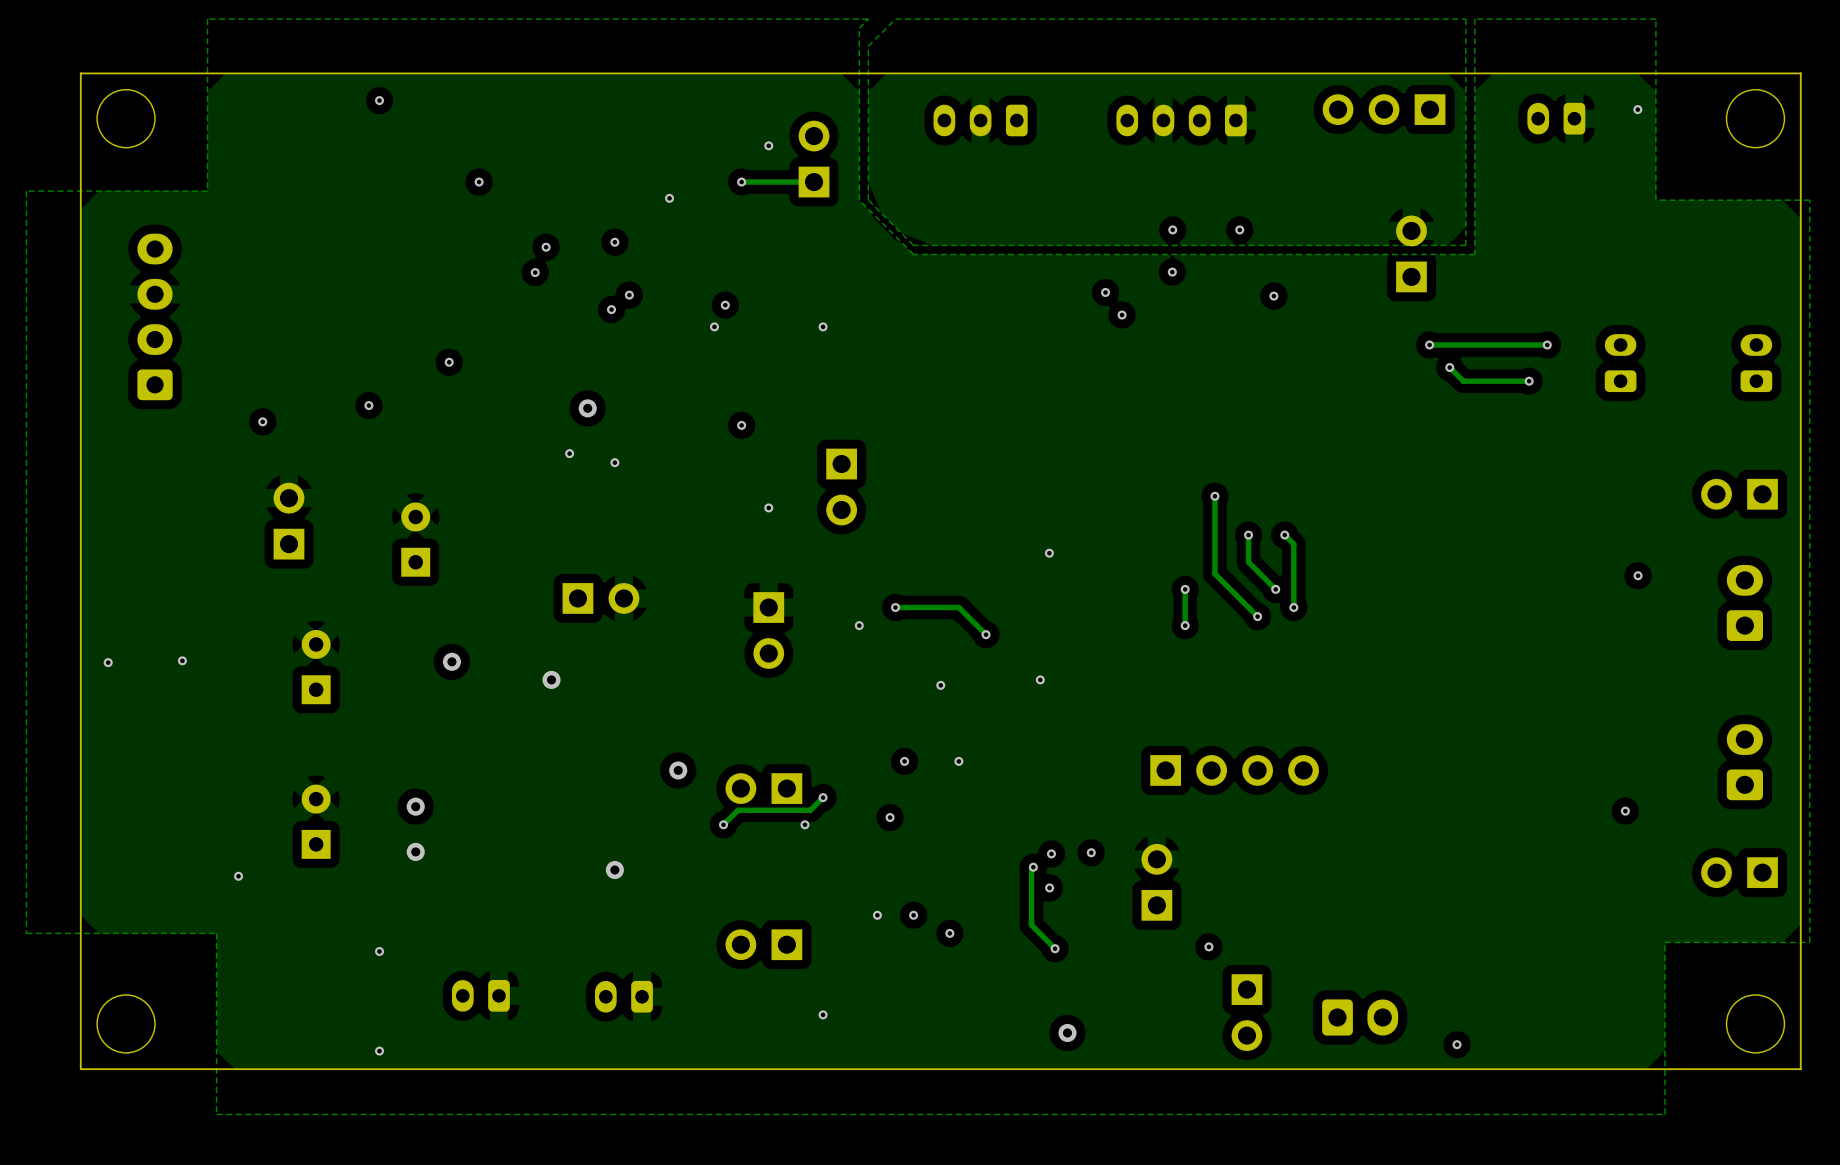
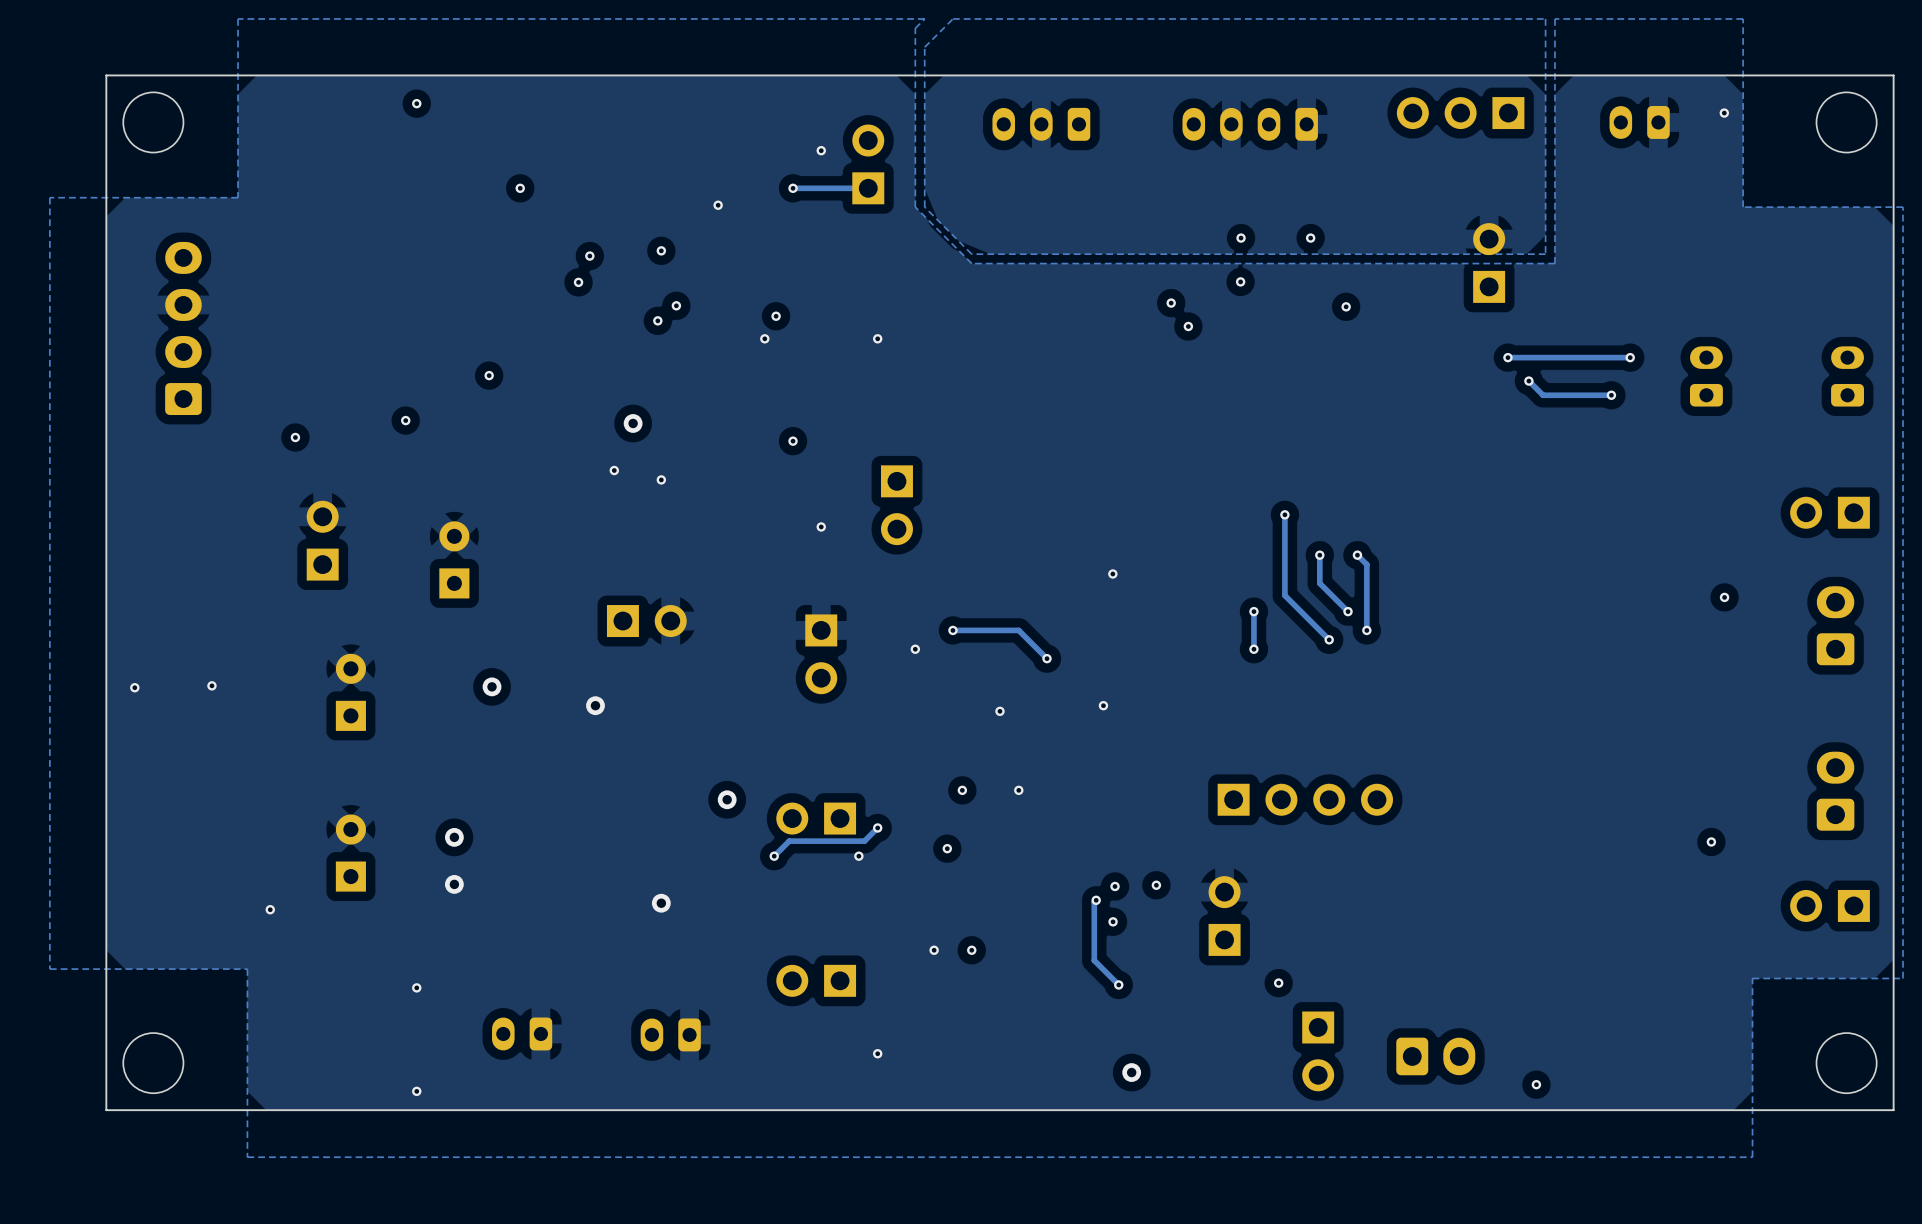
via: (949, 933) -> none

